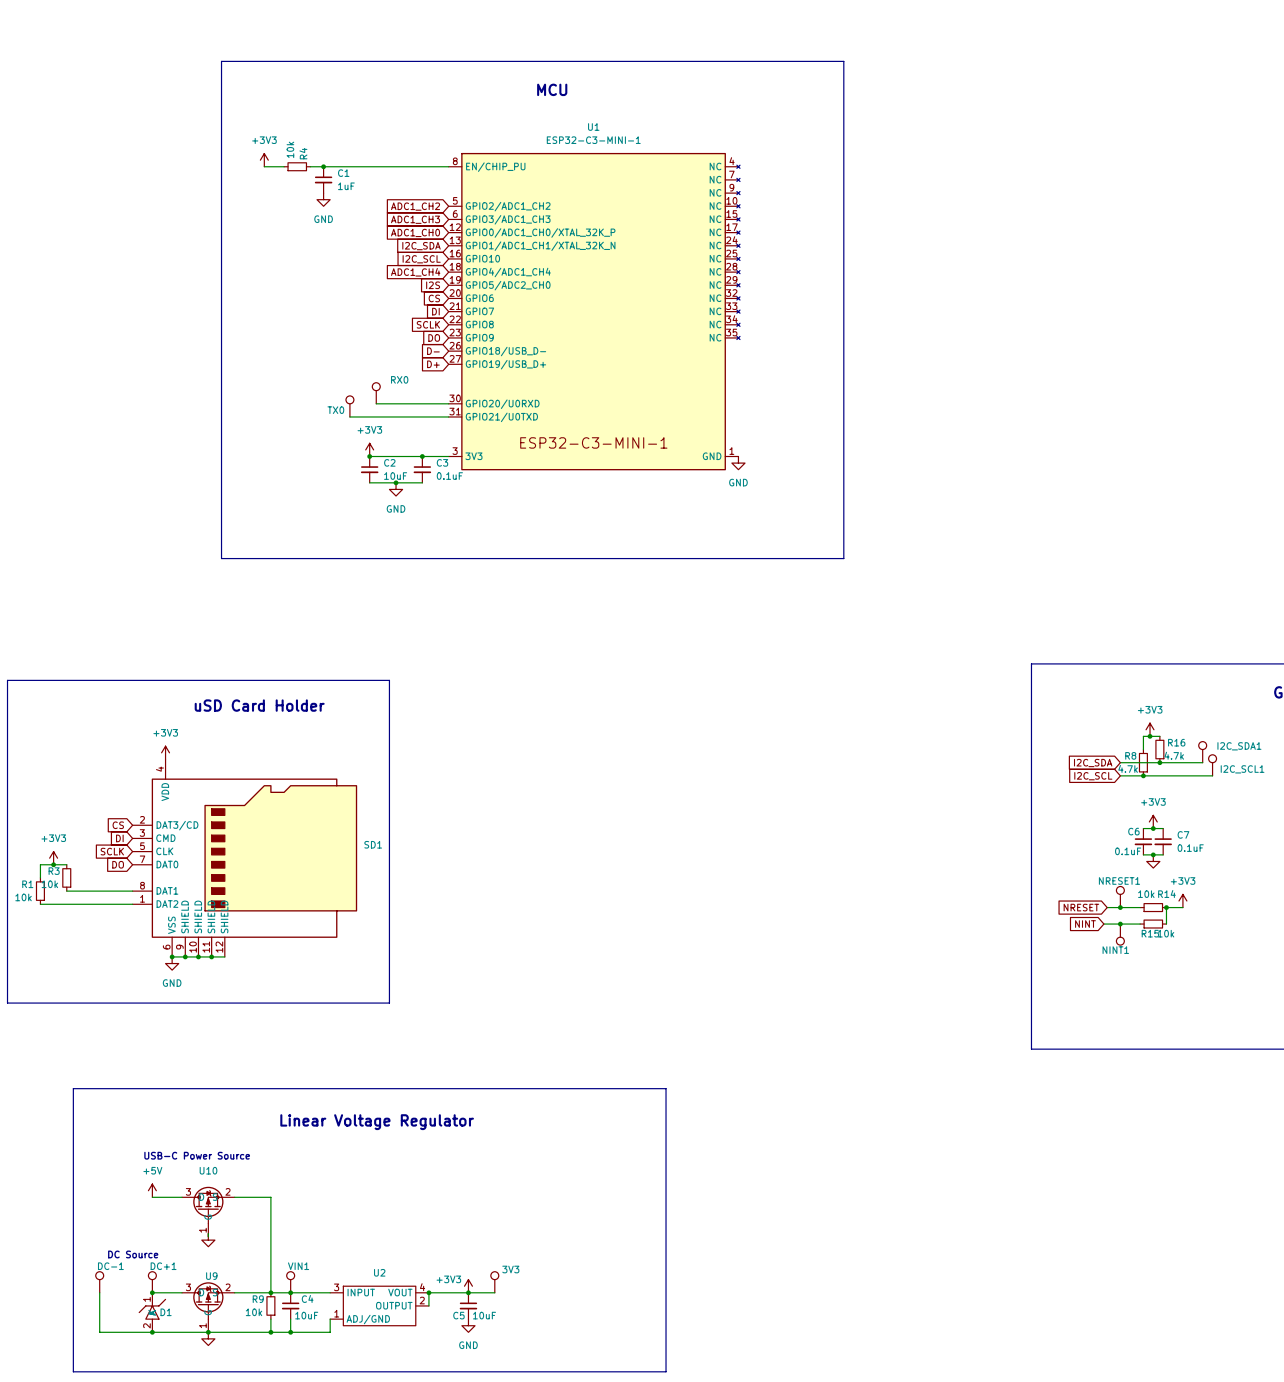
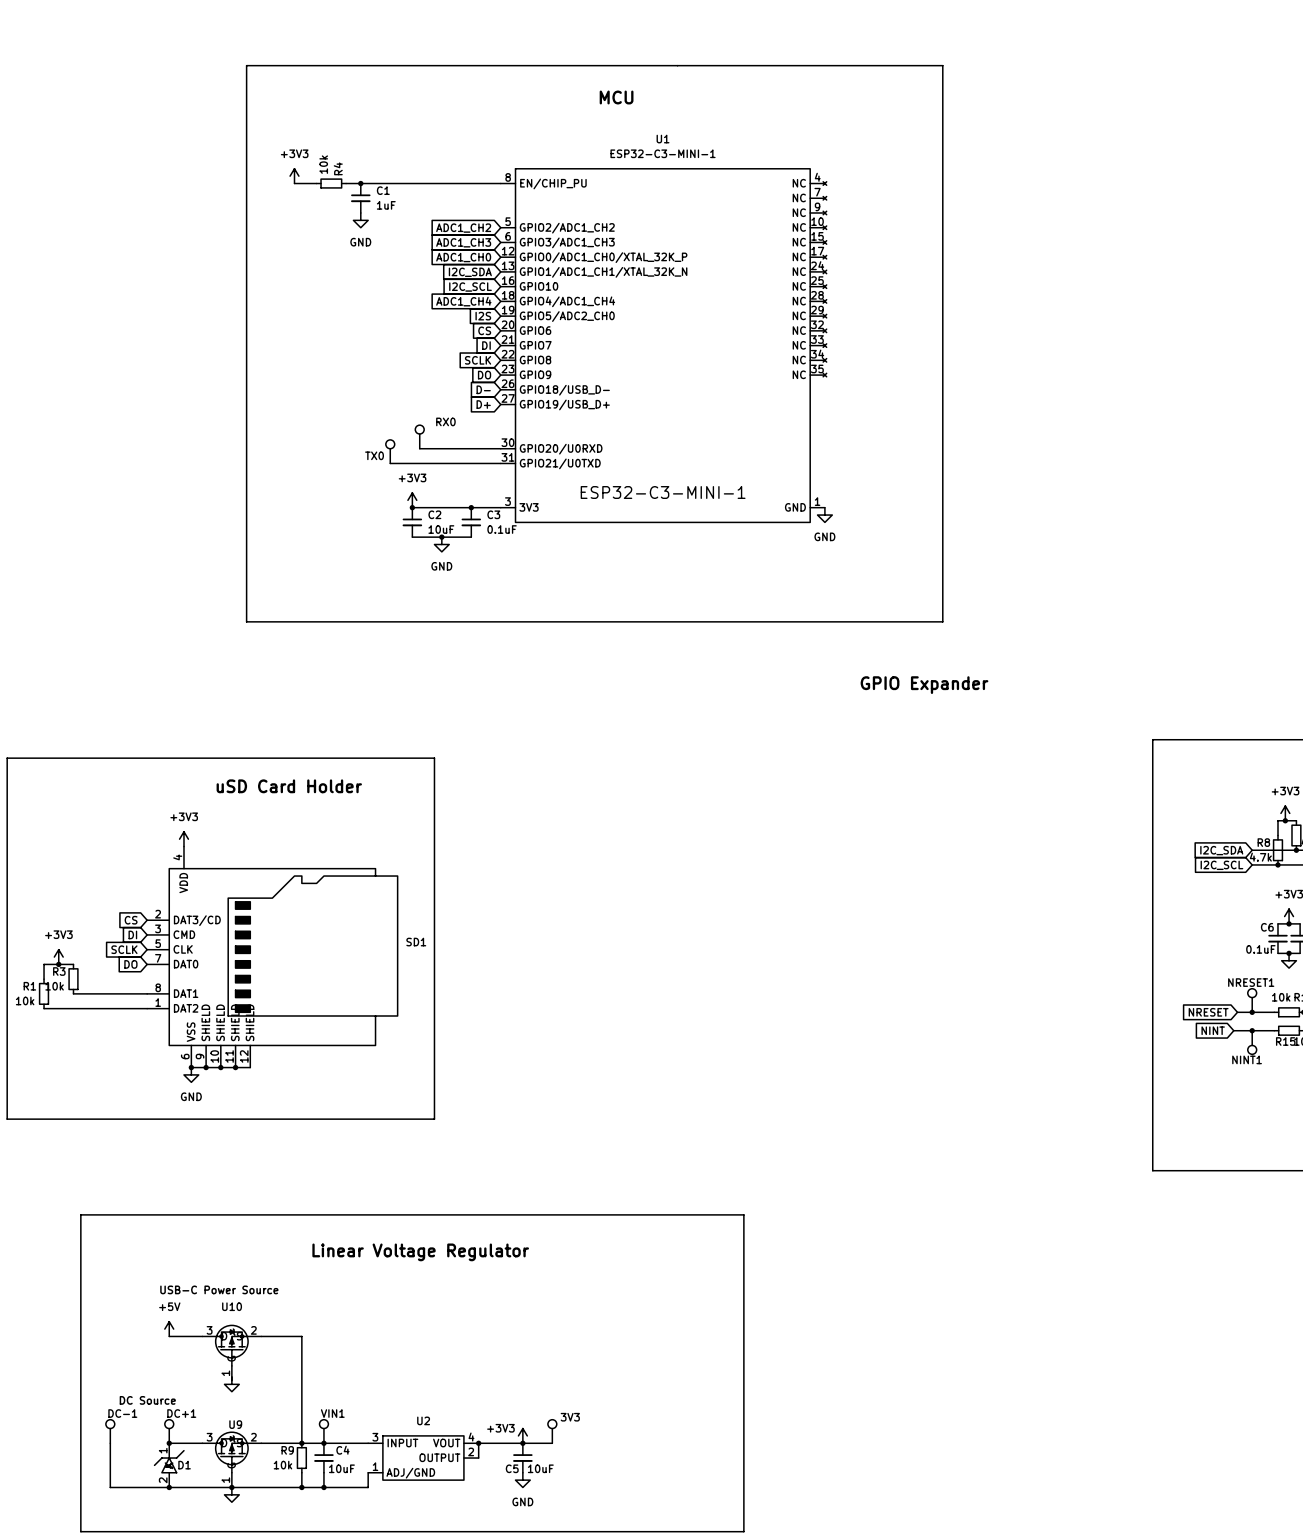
text: none -> GPIO Expander (924, 685)

